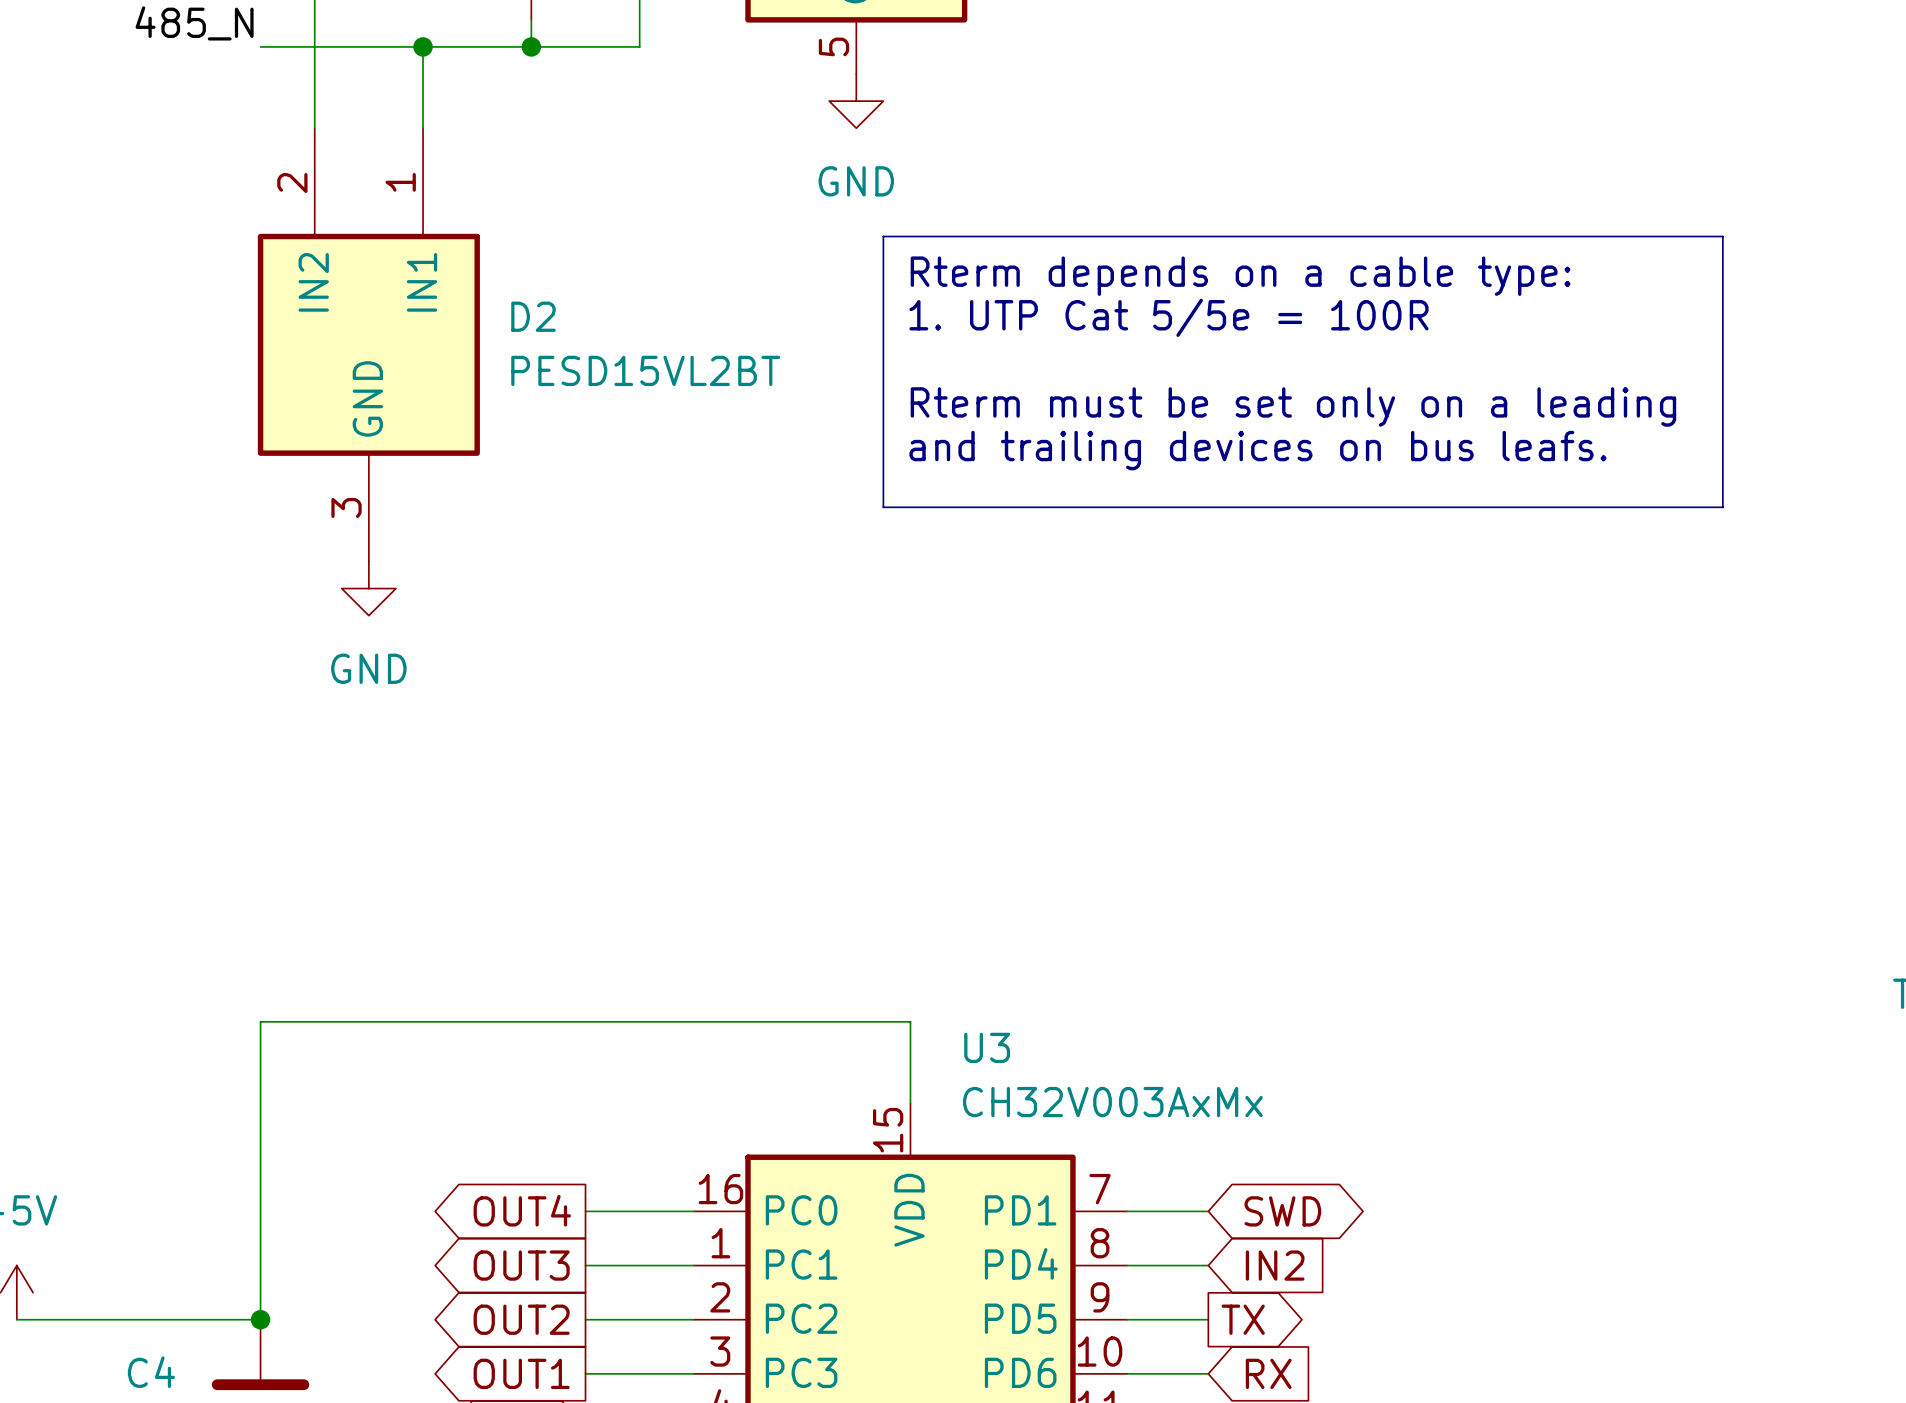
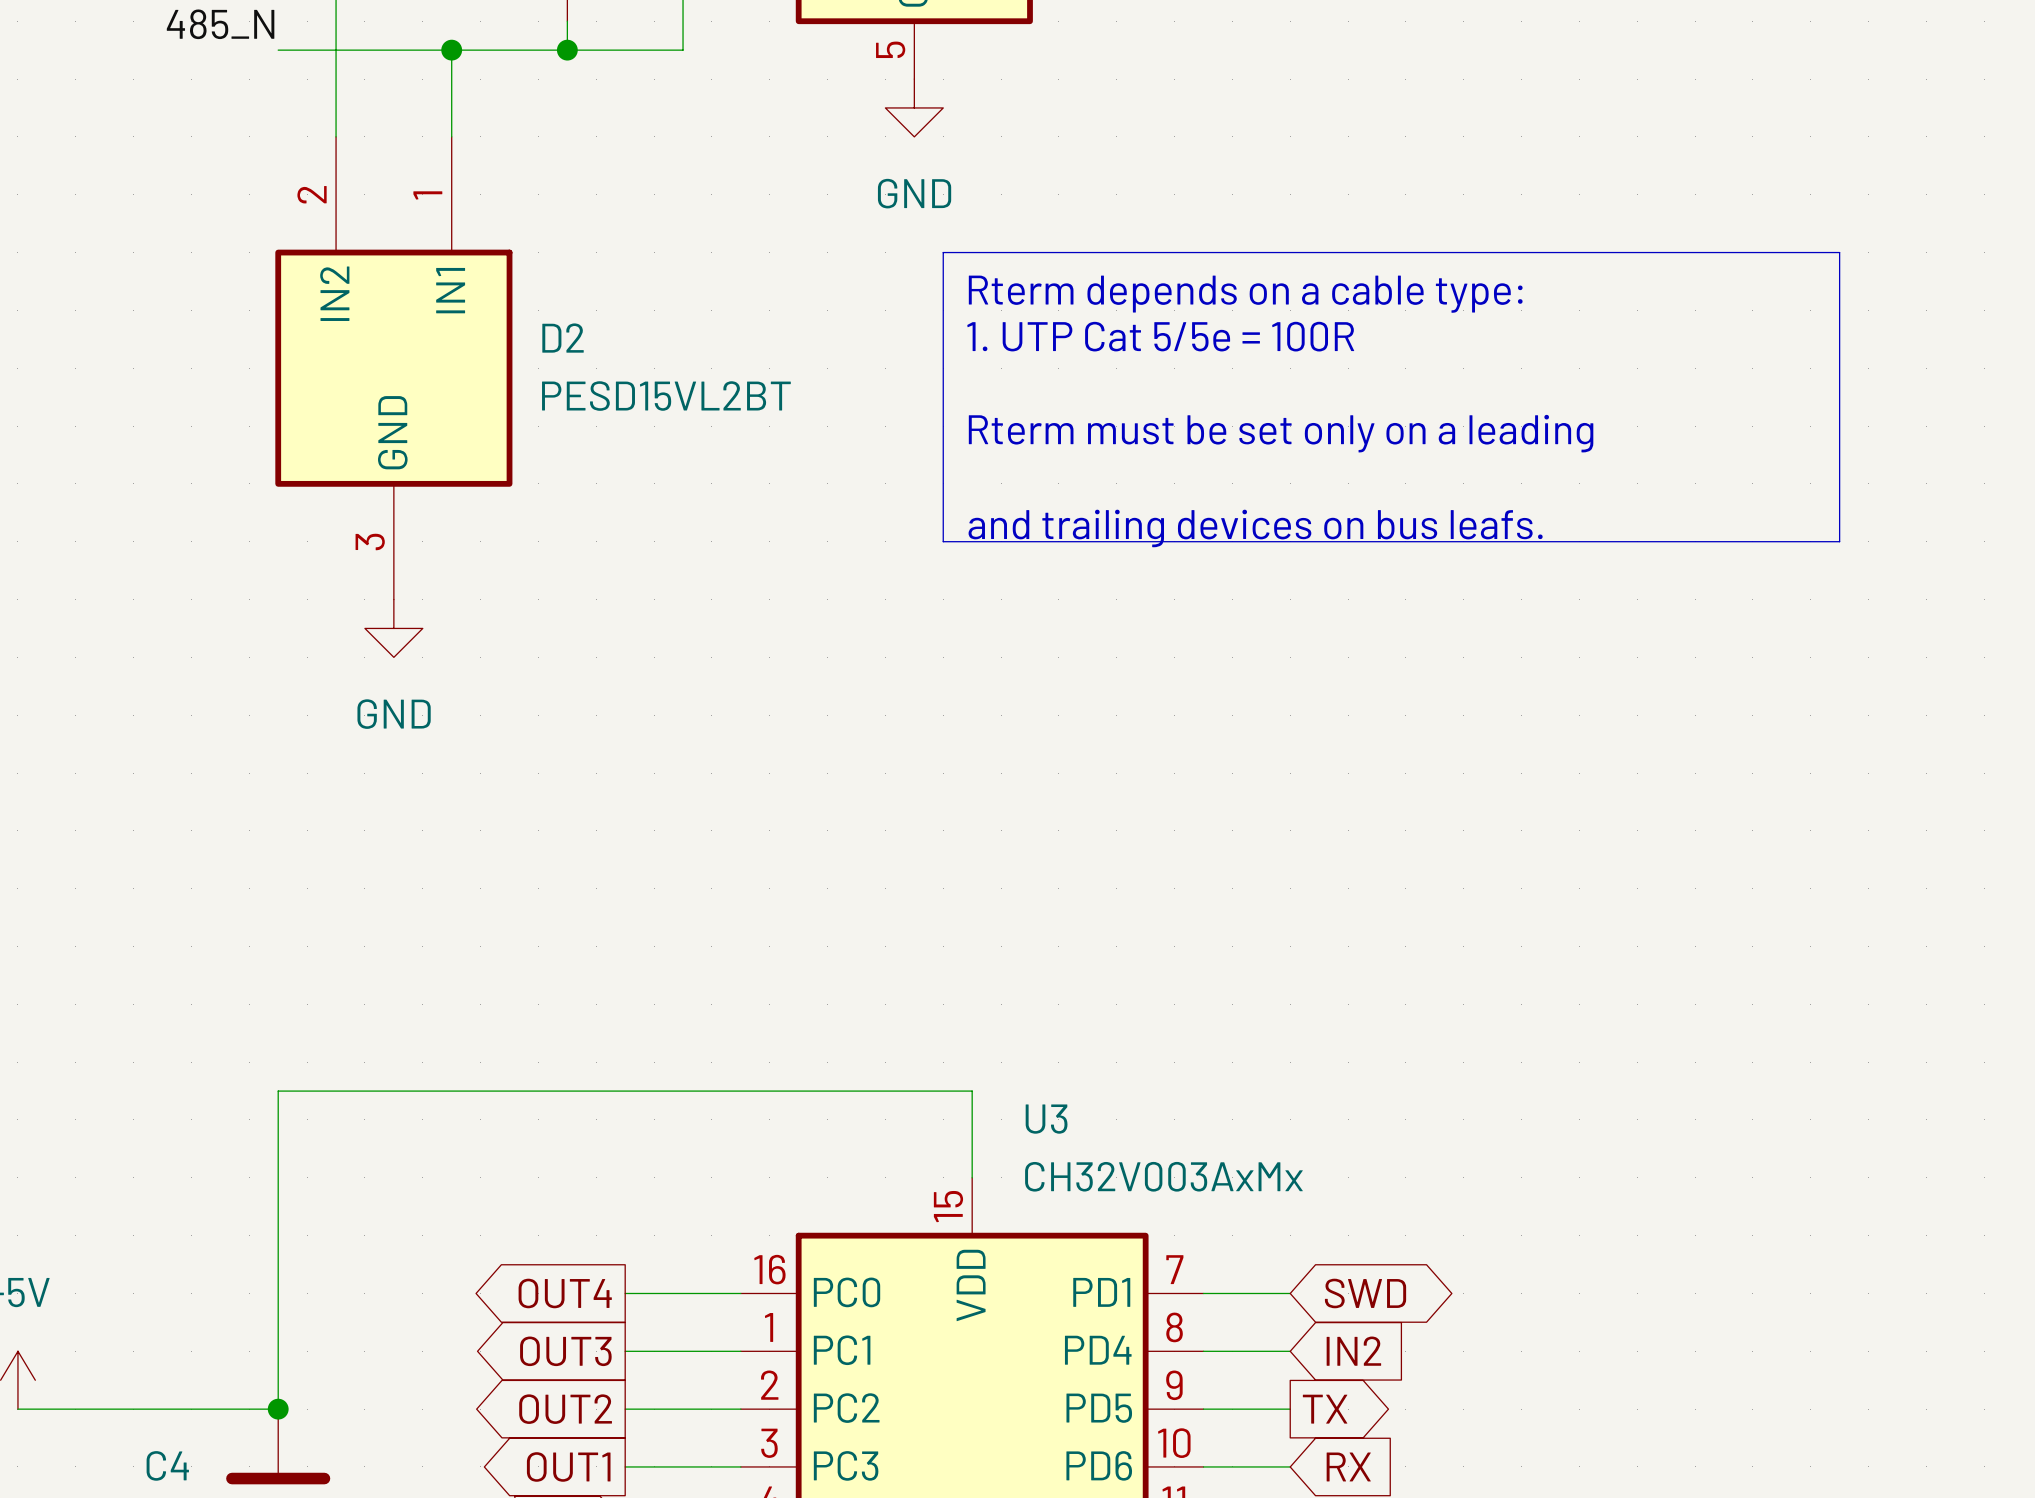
text position: and trailing devices on bus leafs. (1257, 450) -> and trailing devices on bus leafs. (1255, 528)

